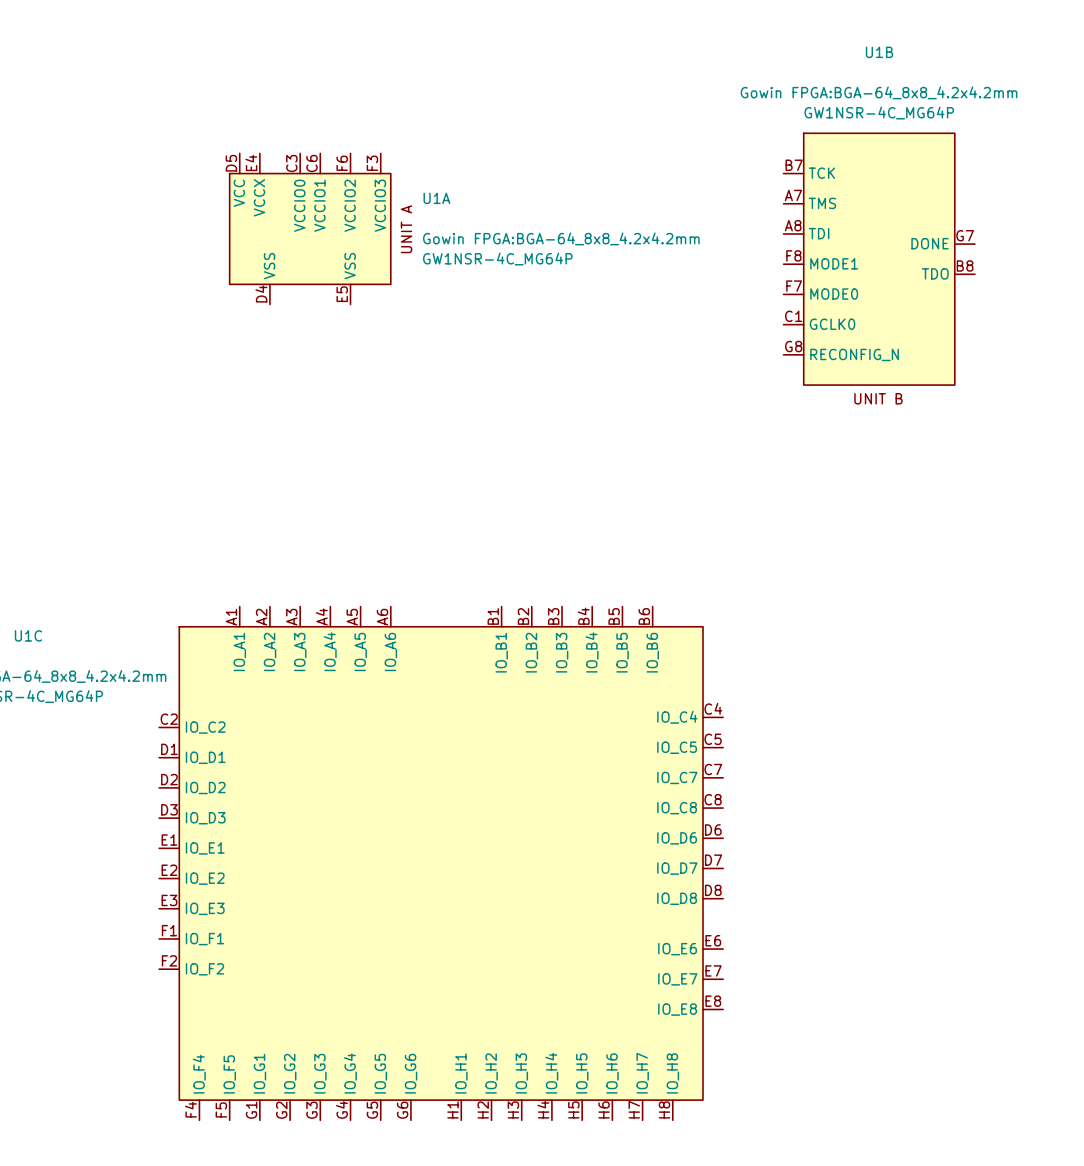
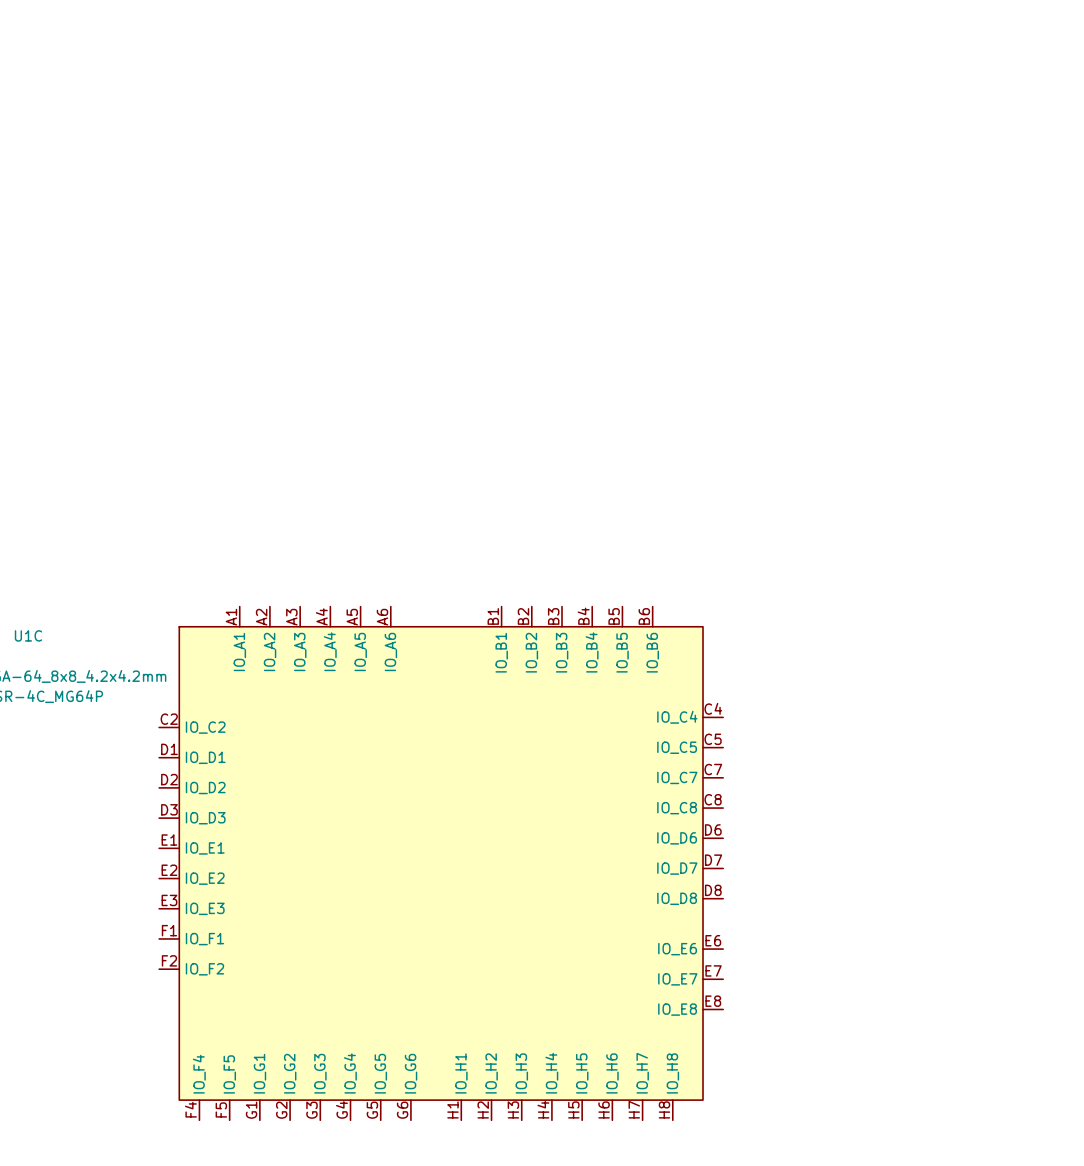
U1A: (310, 228) -> none
U1B: (879, 259) -> none

